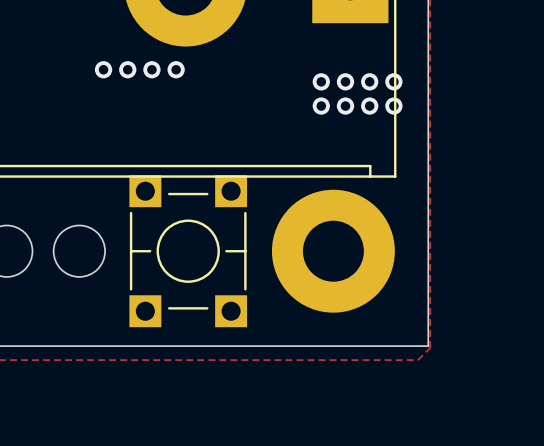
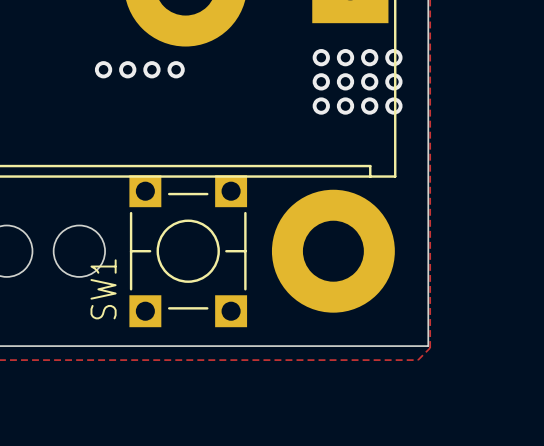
via: none -> (321, 57)
via: none -> (345, 57)
via: none -> (369, 57)
via: none -> (393, 57)
SW1 name: none -> SW1 (103, 289)

